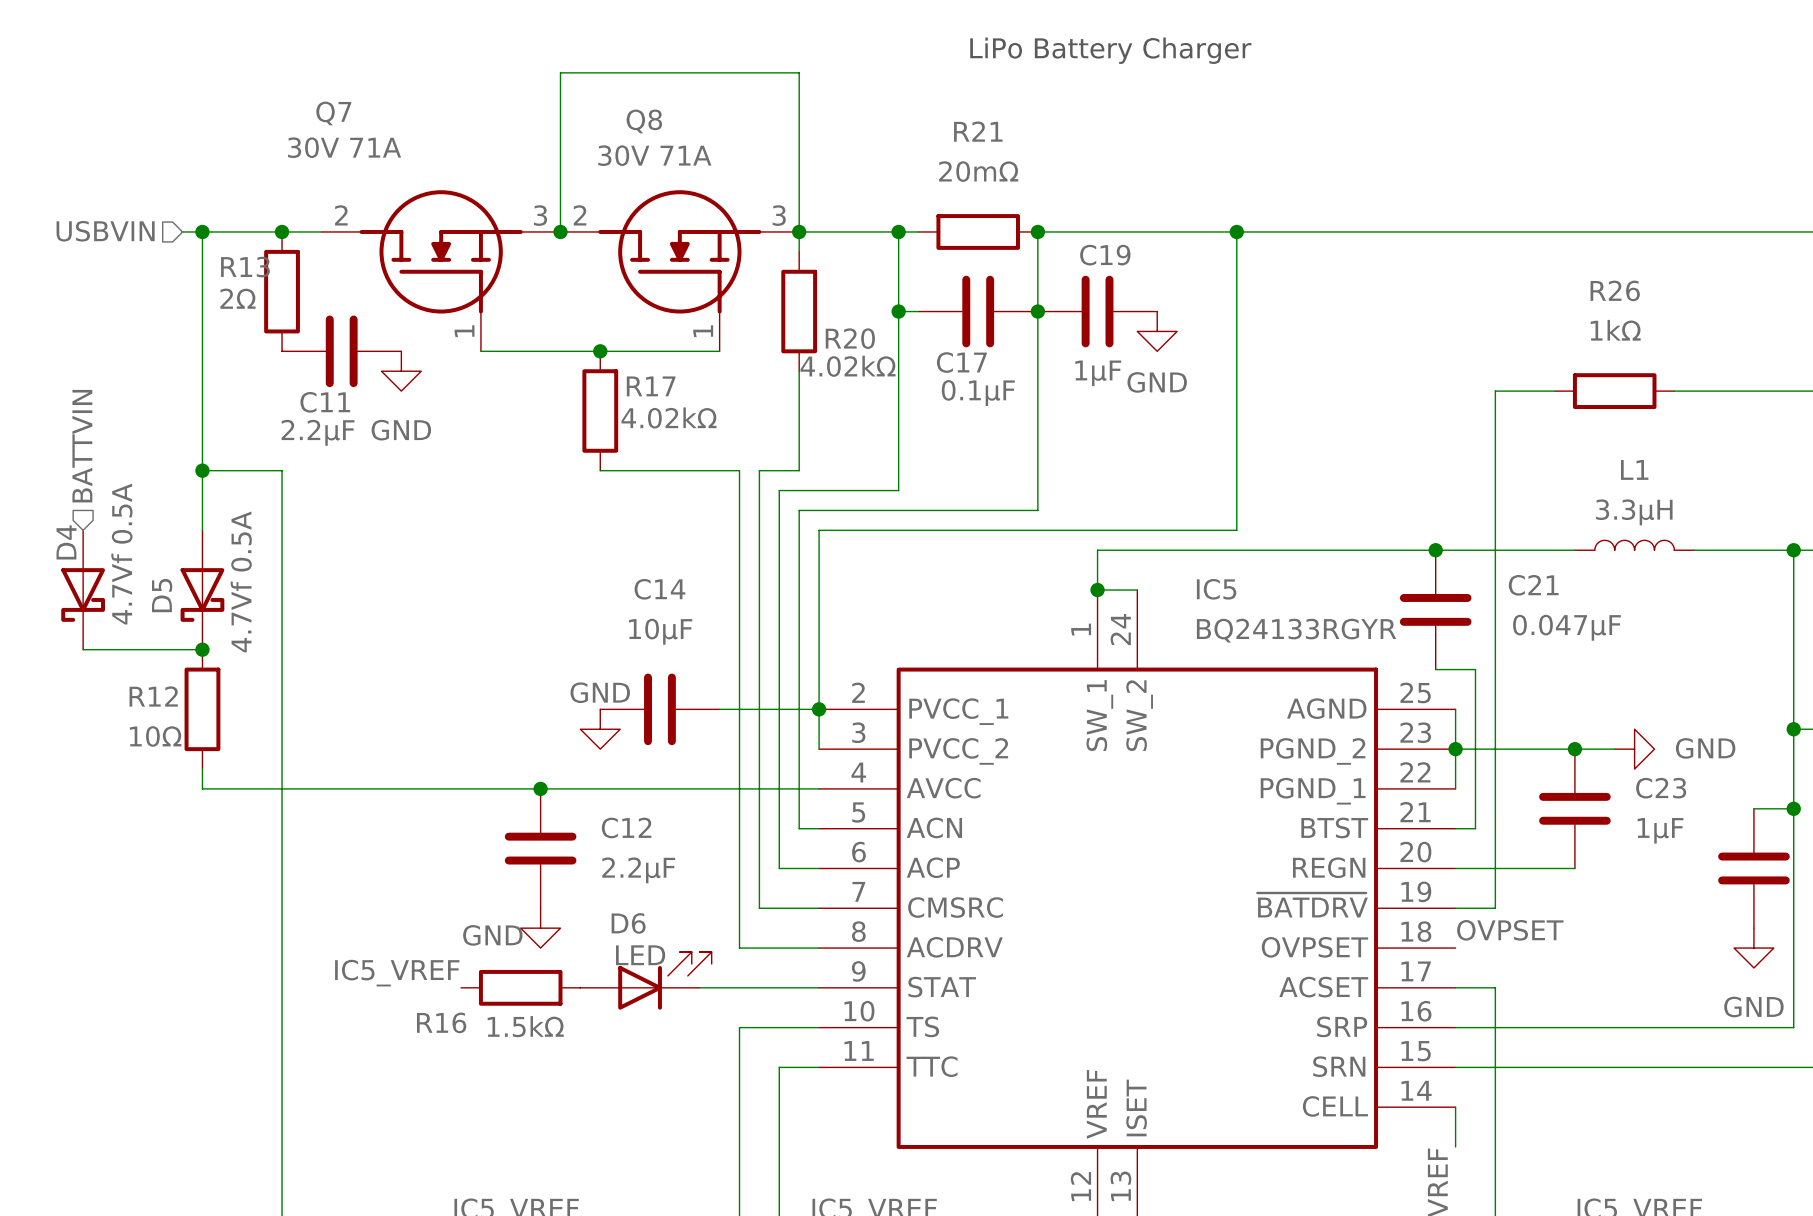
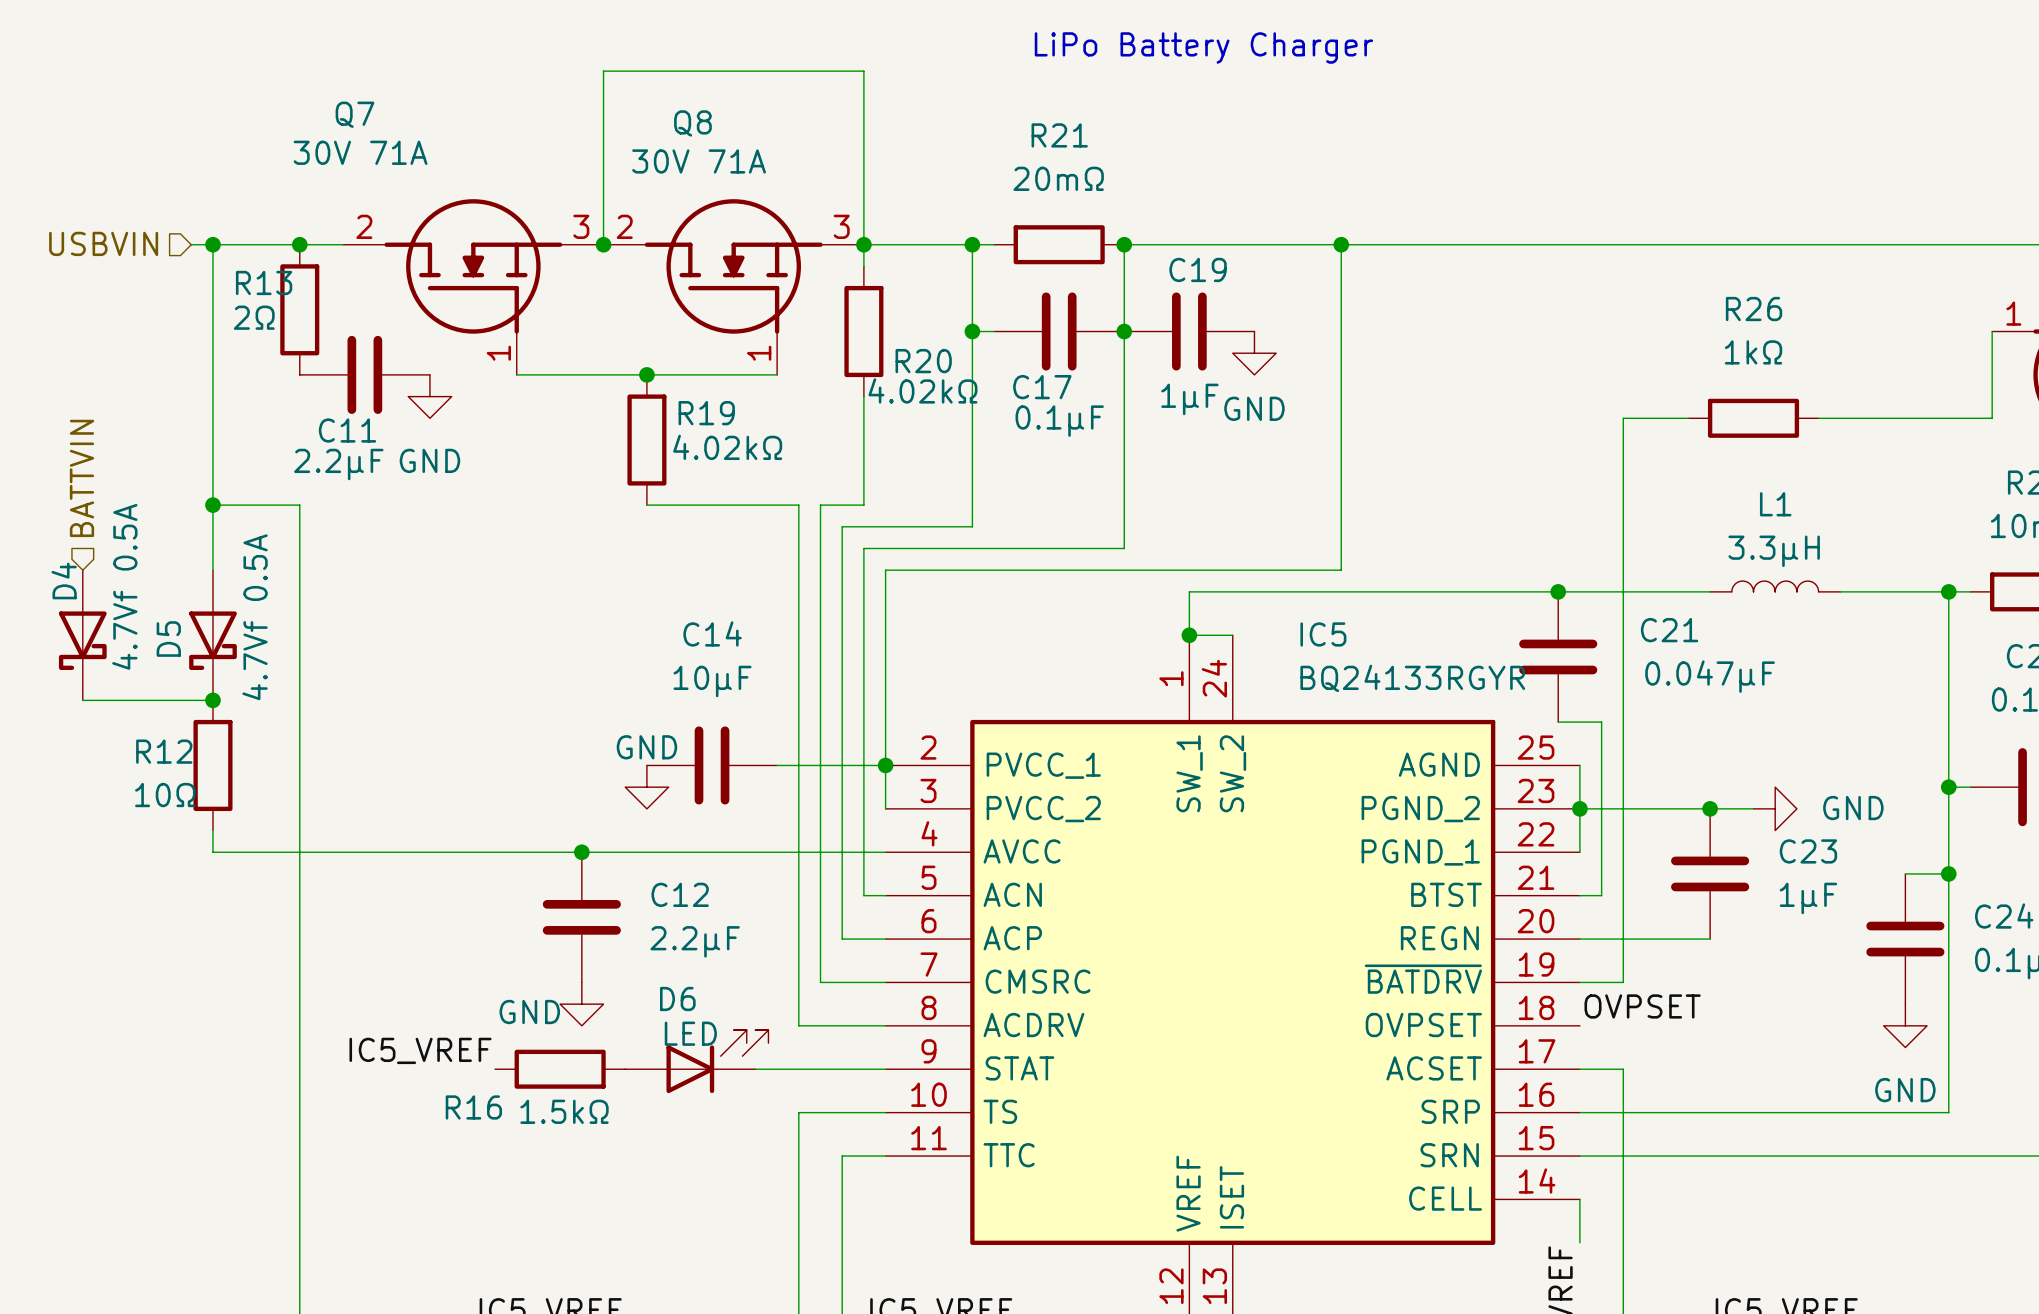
R17 name: R17 (651, 386) -> R19 (706, 413)

